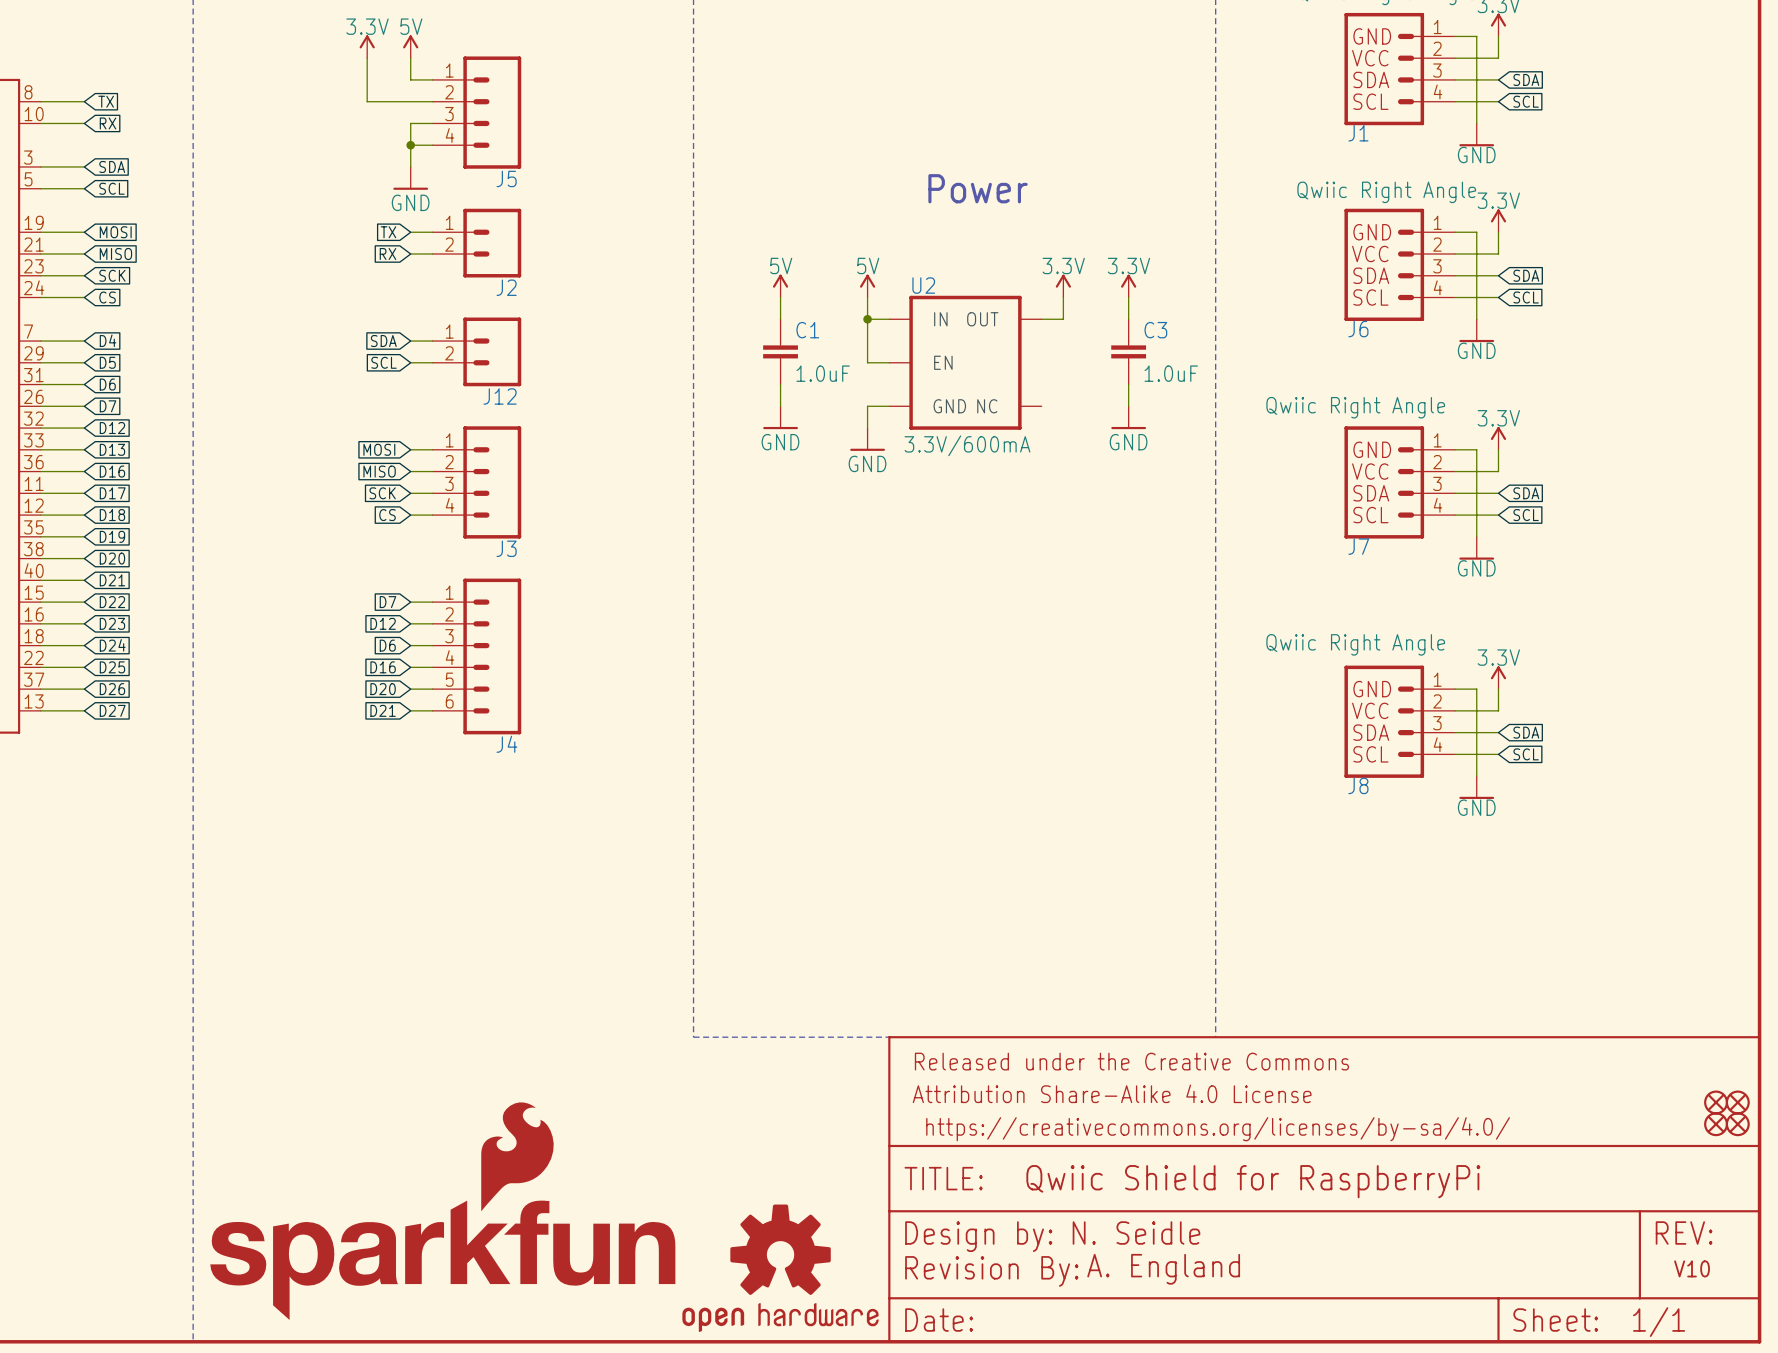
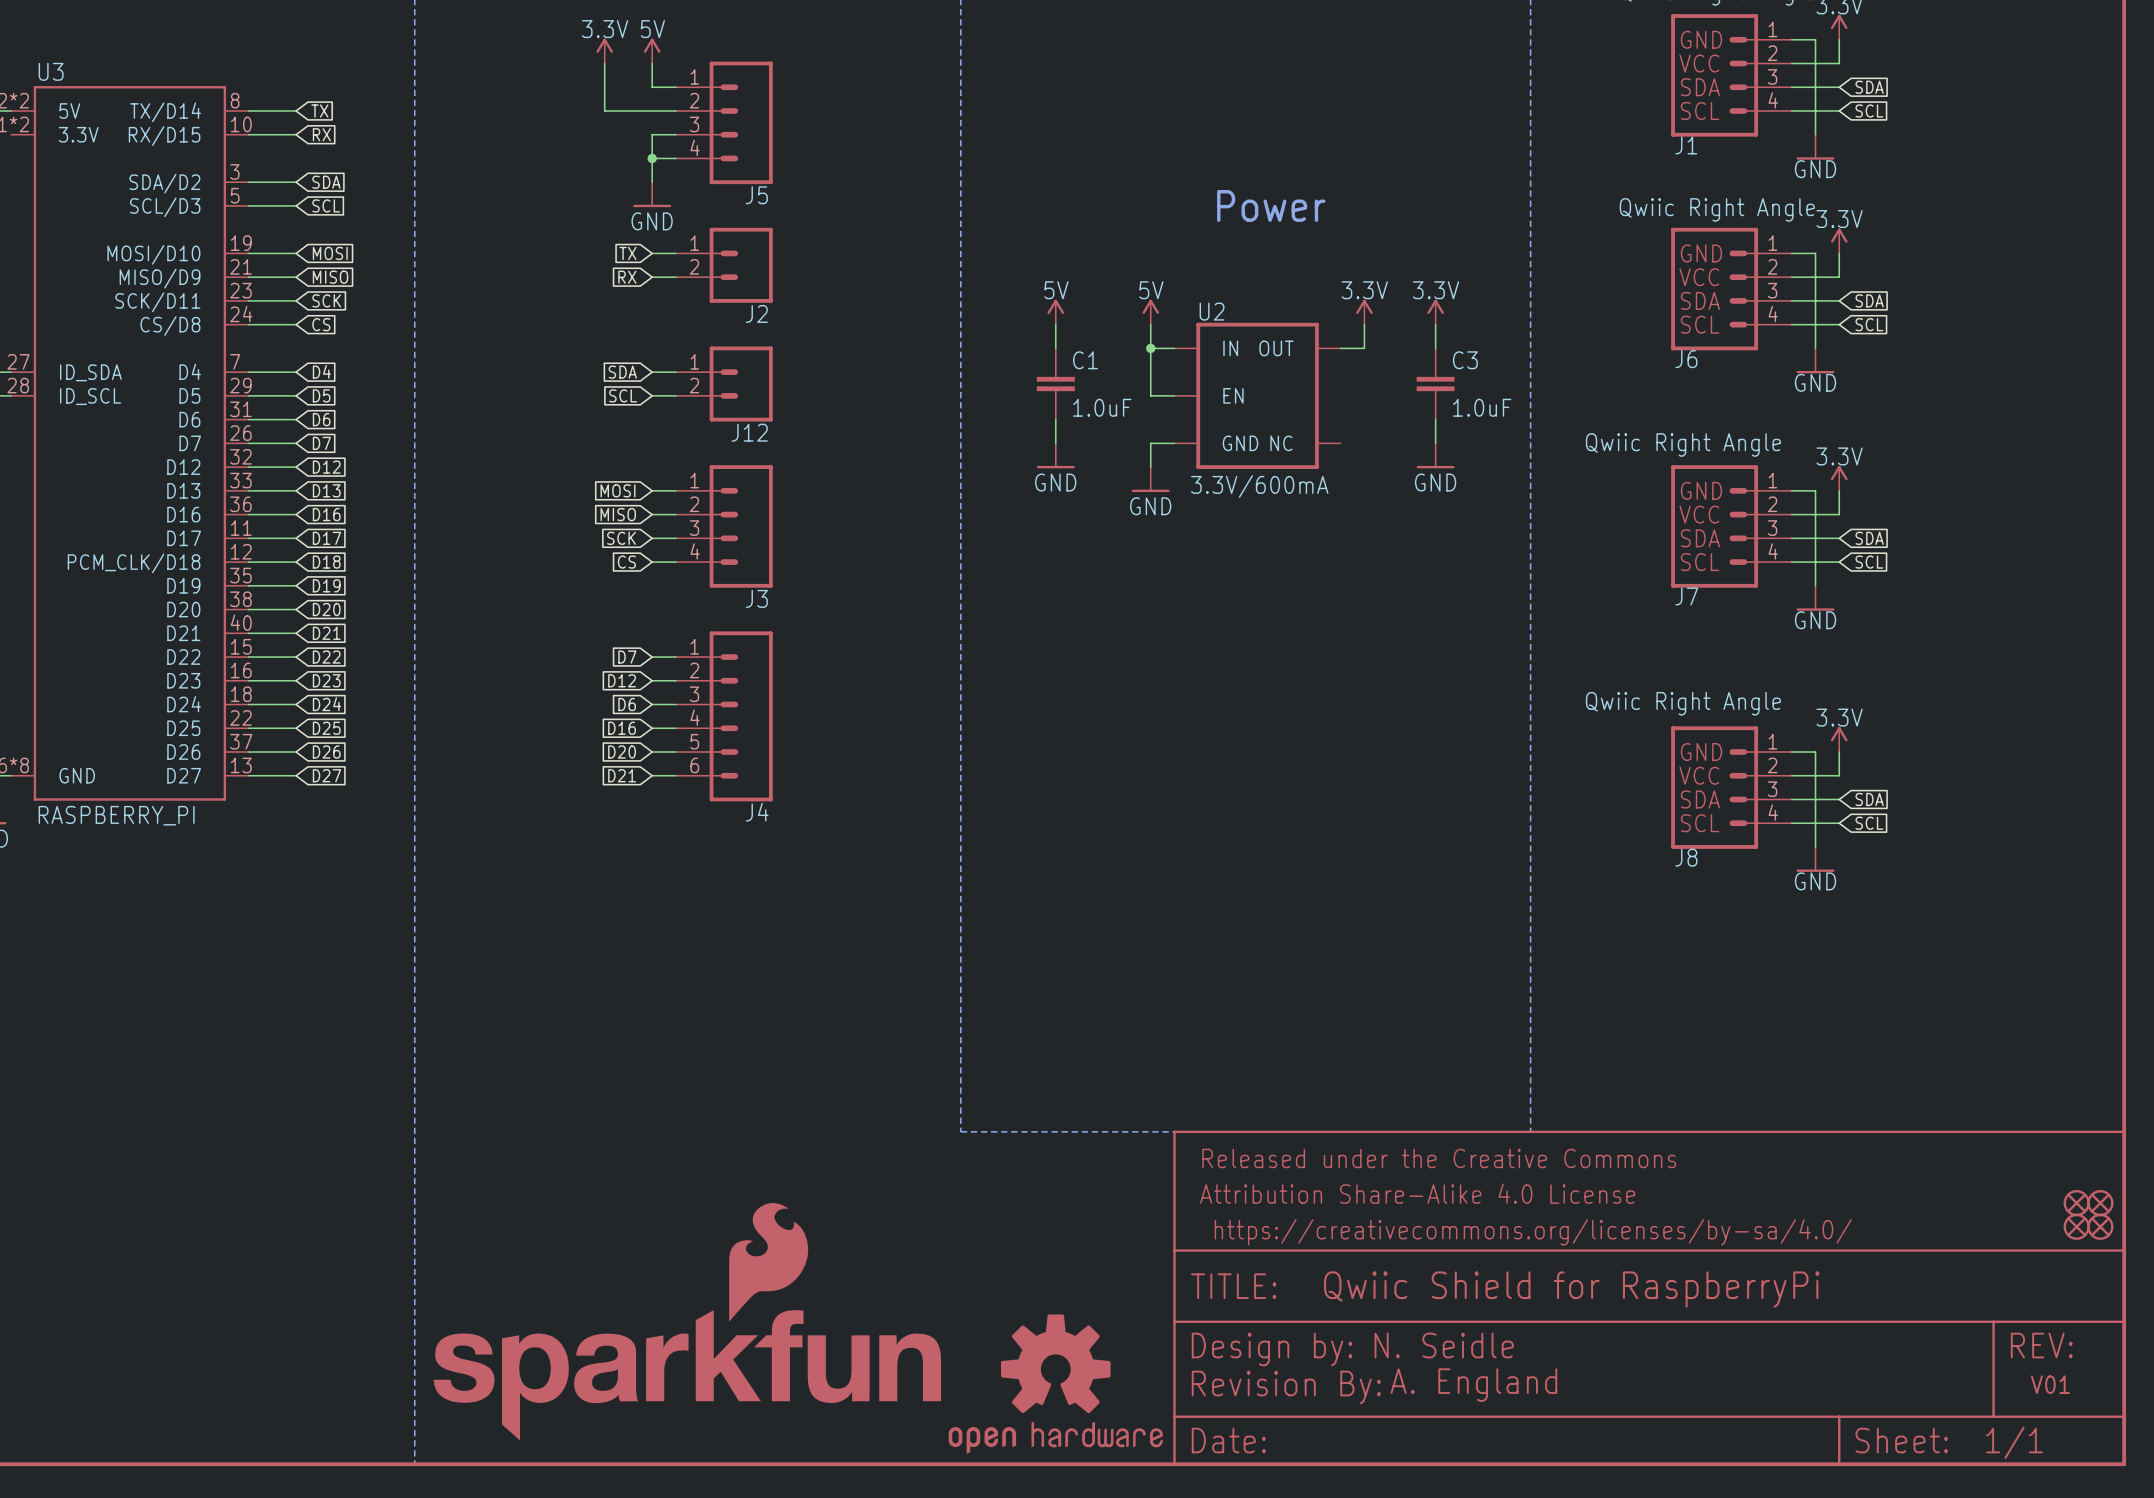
text: V10 (1692, 1268) -> V01 (2050, 1384)

